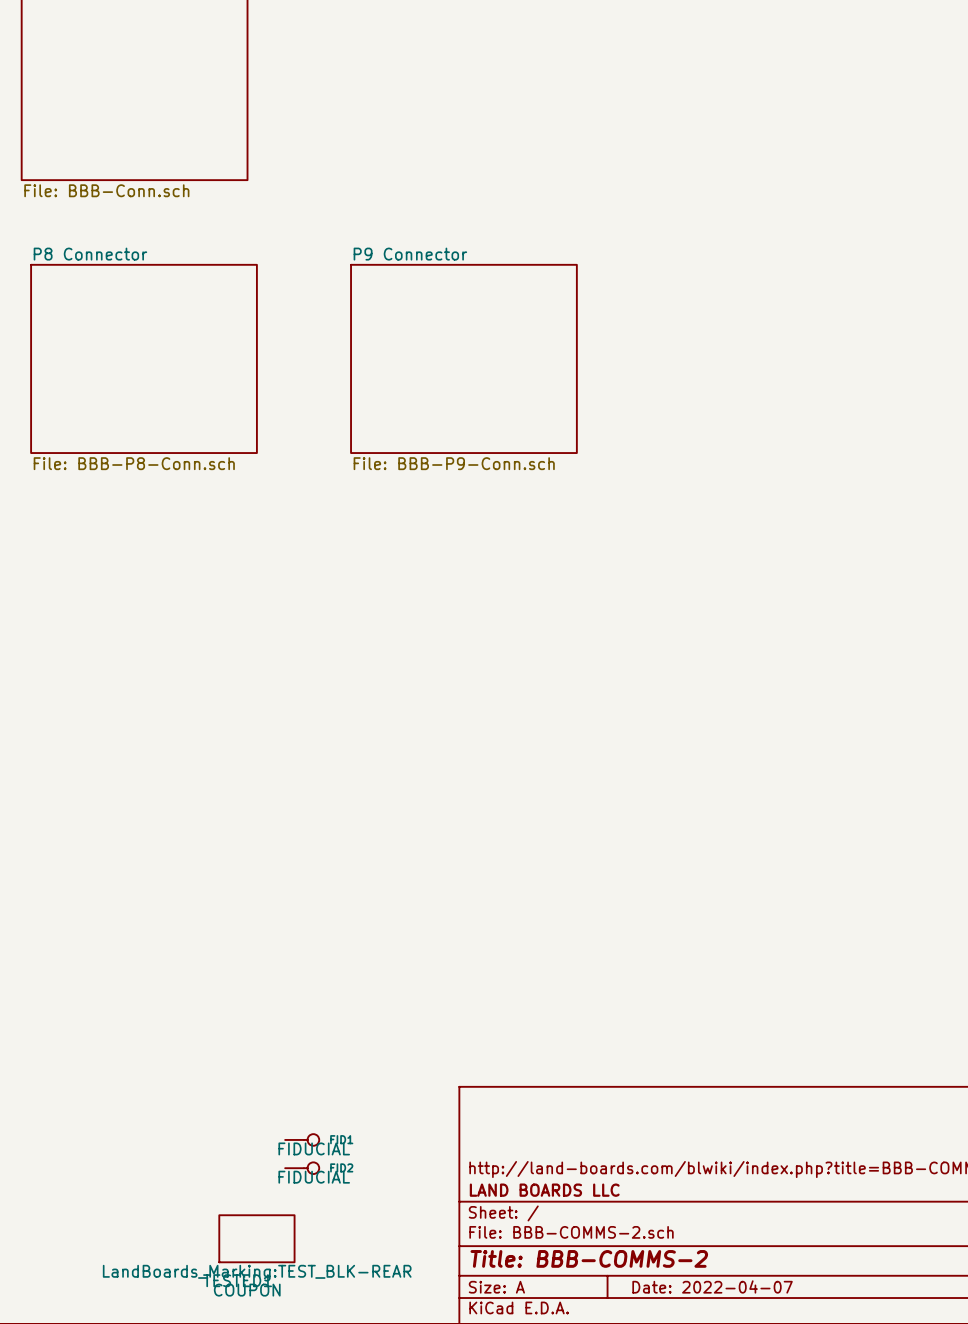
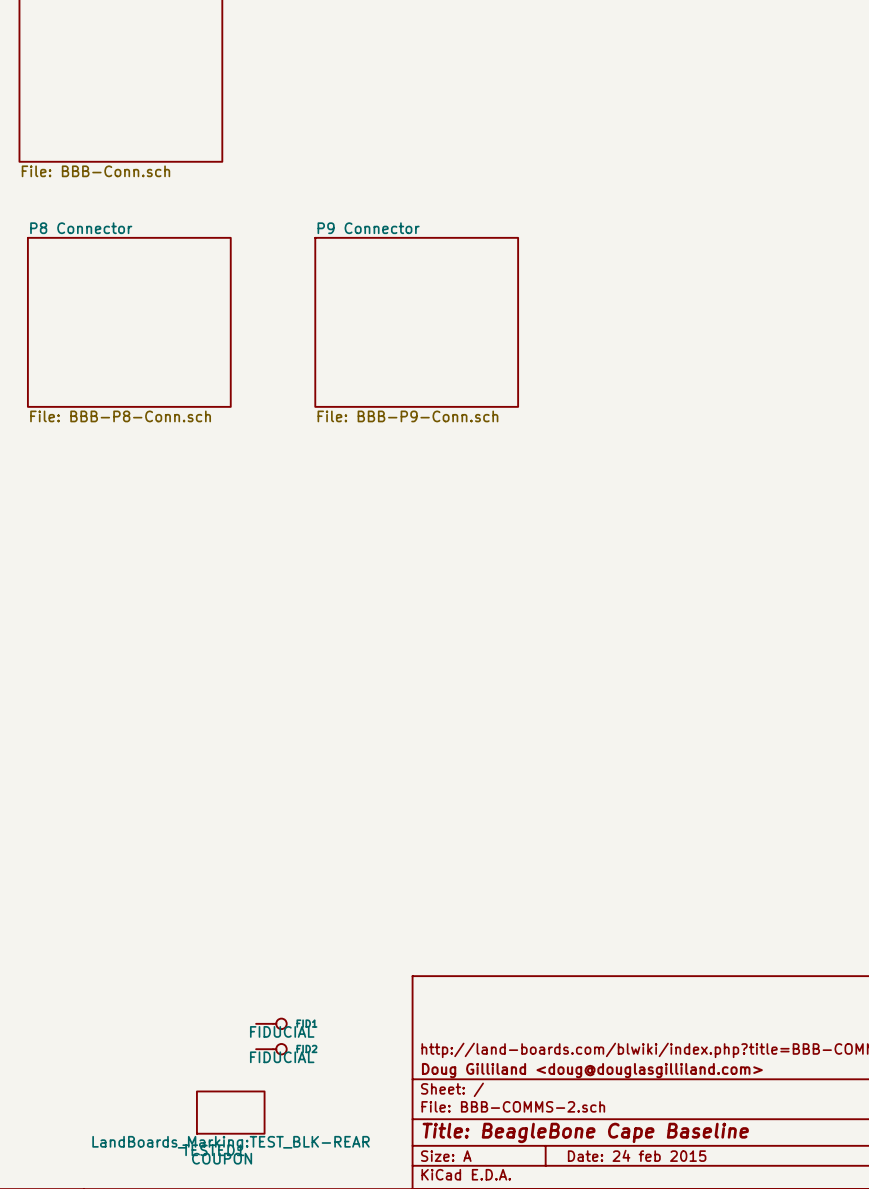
title block: LAND BOARDS LLC (544, 1190) -> Doug Gilliland <doug@douglasgilliland.com> (592, 1070)
title block: Title: BBB-COMMS-2 (589, 1258) -> Title: BeagleBone Cape Baseline (585, 1132)
title block: Date: 2022-04-07 (712, 1286) -> Date: 24 feb 2015 (637, 1155)

